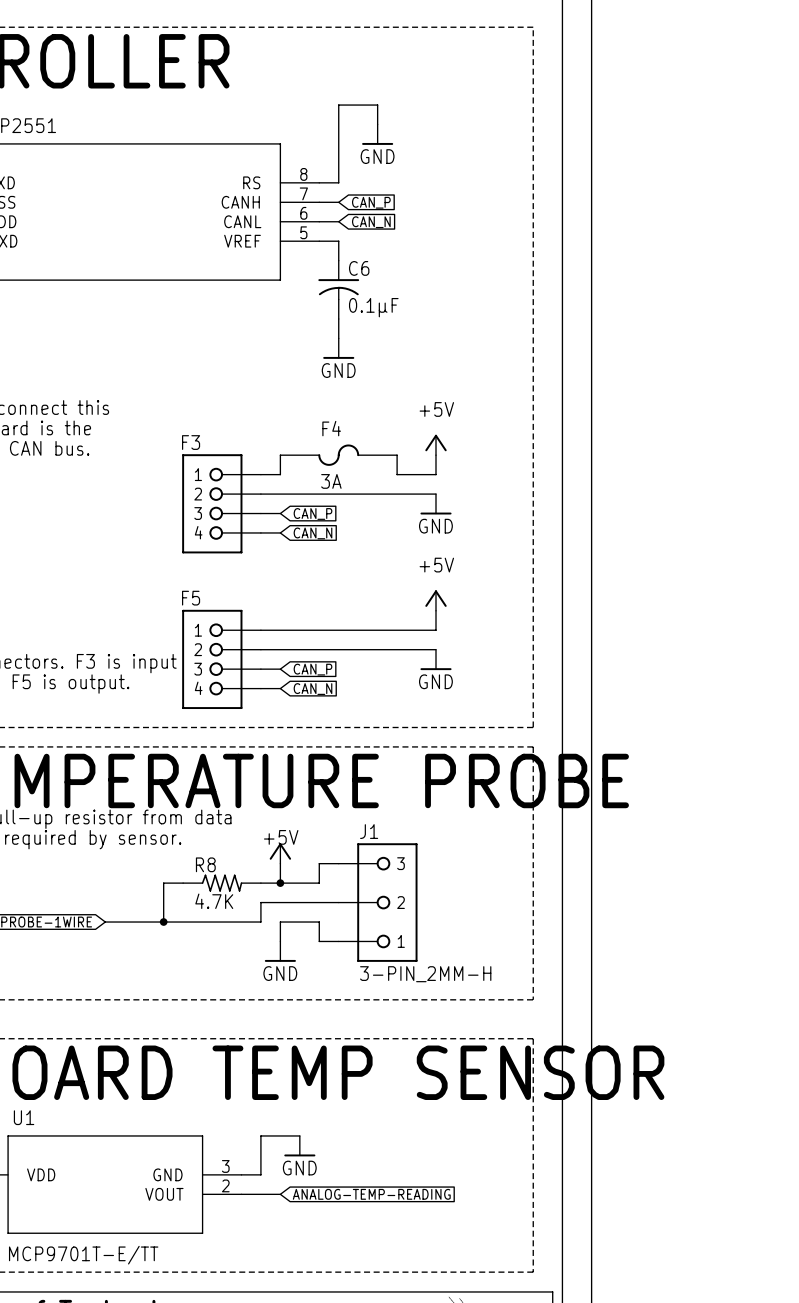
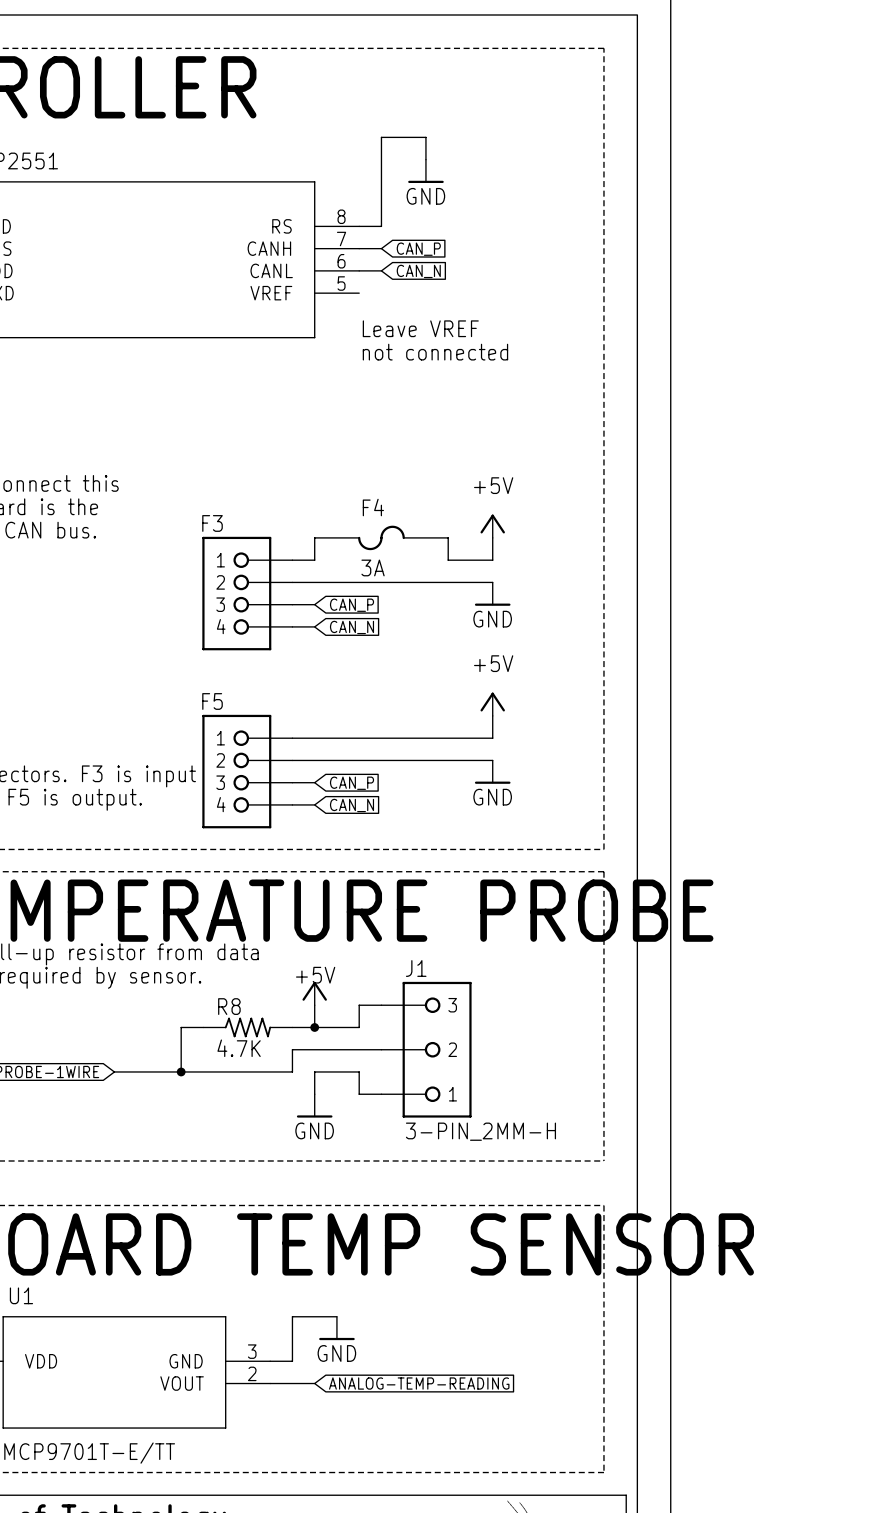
wire: (319, 241) (338, 241) (338, 260) -> none
text: none -> Leave VREF (420, 328)
C6: 0.1µF (338, 289) -> none
text: none -> not connected (435, 352)
wire: (338, 319) (338, 338) -> none
power symbol: GND (338, 348) -> none

